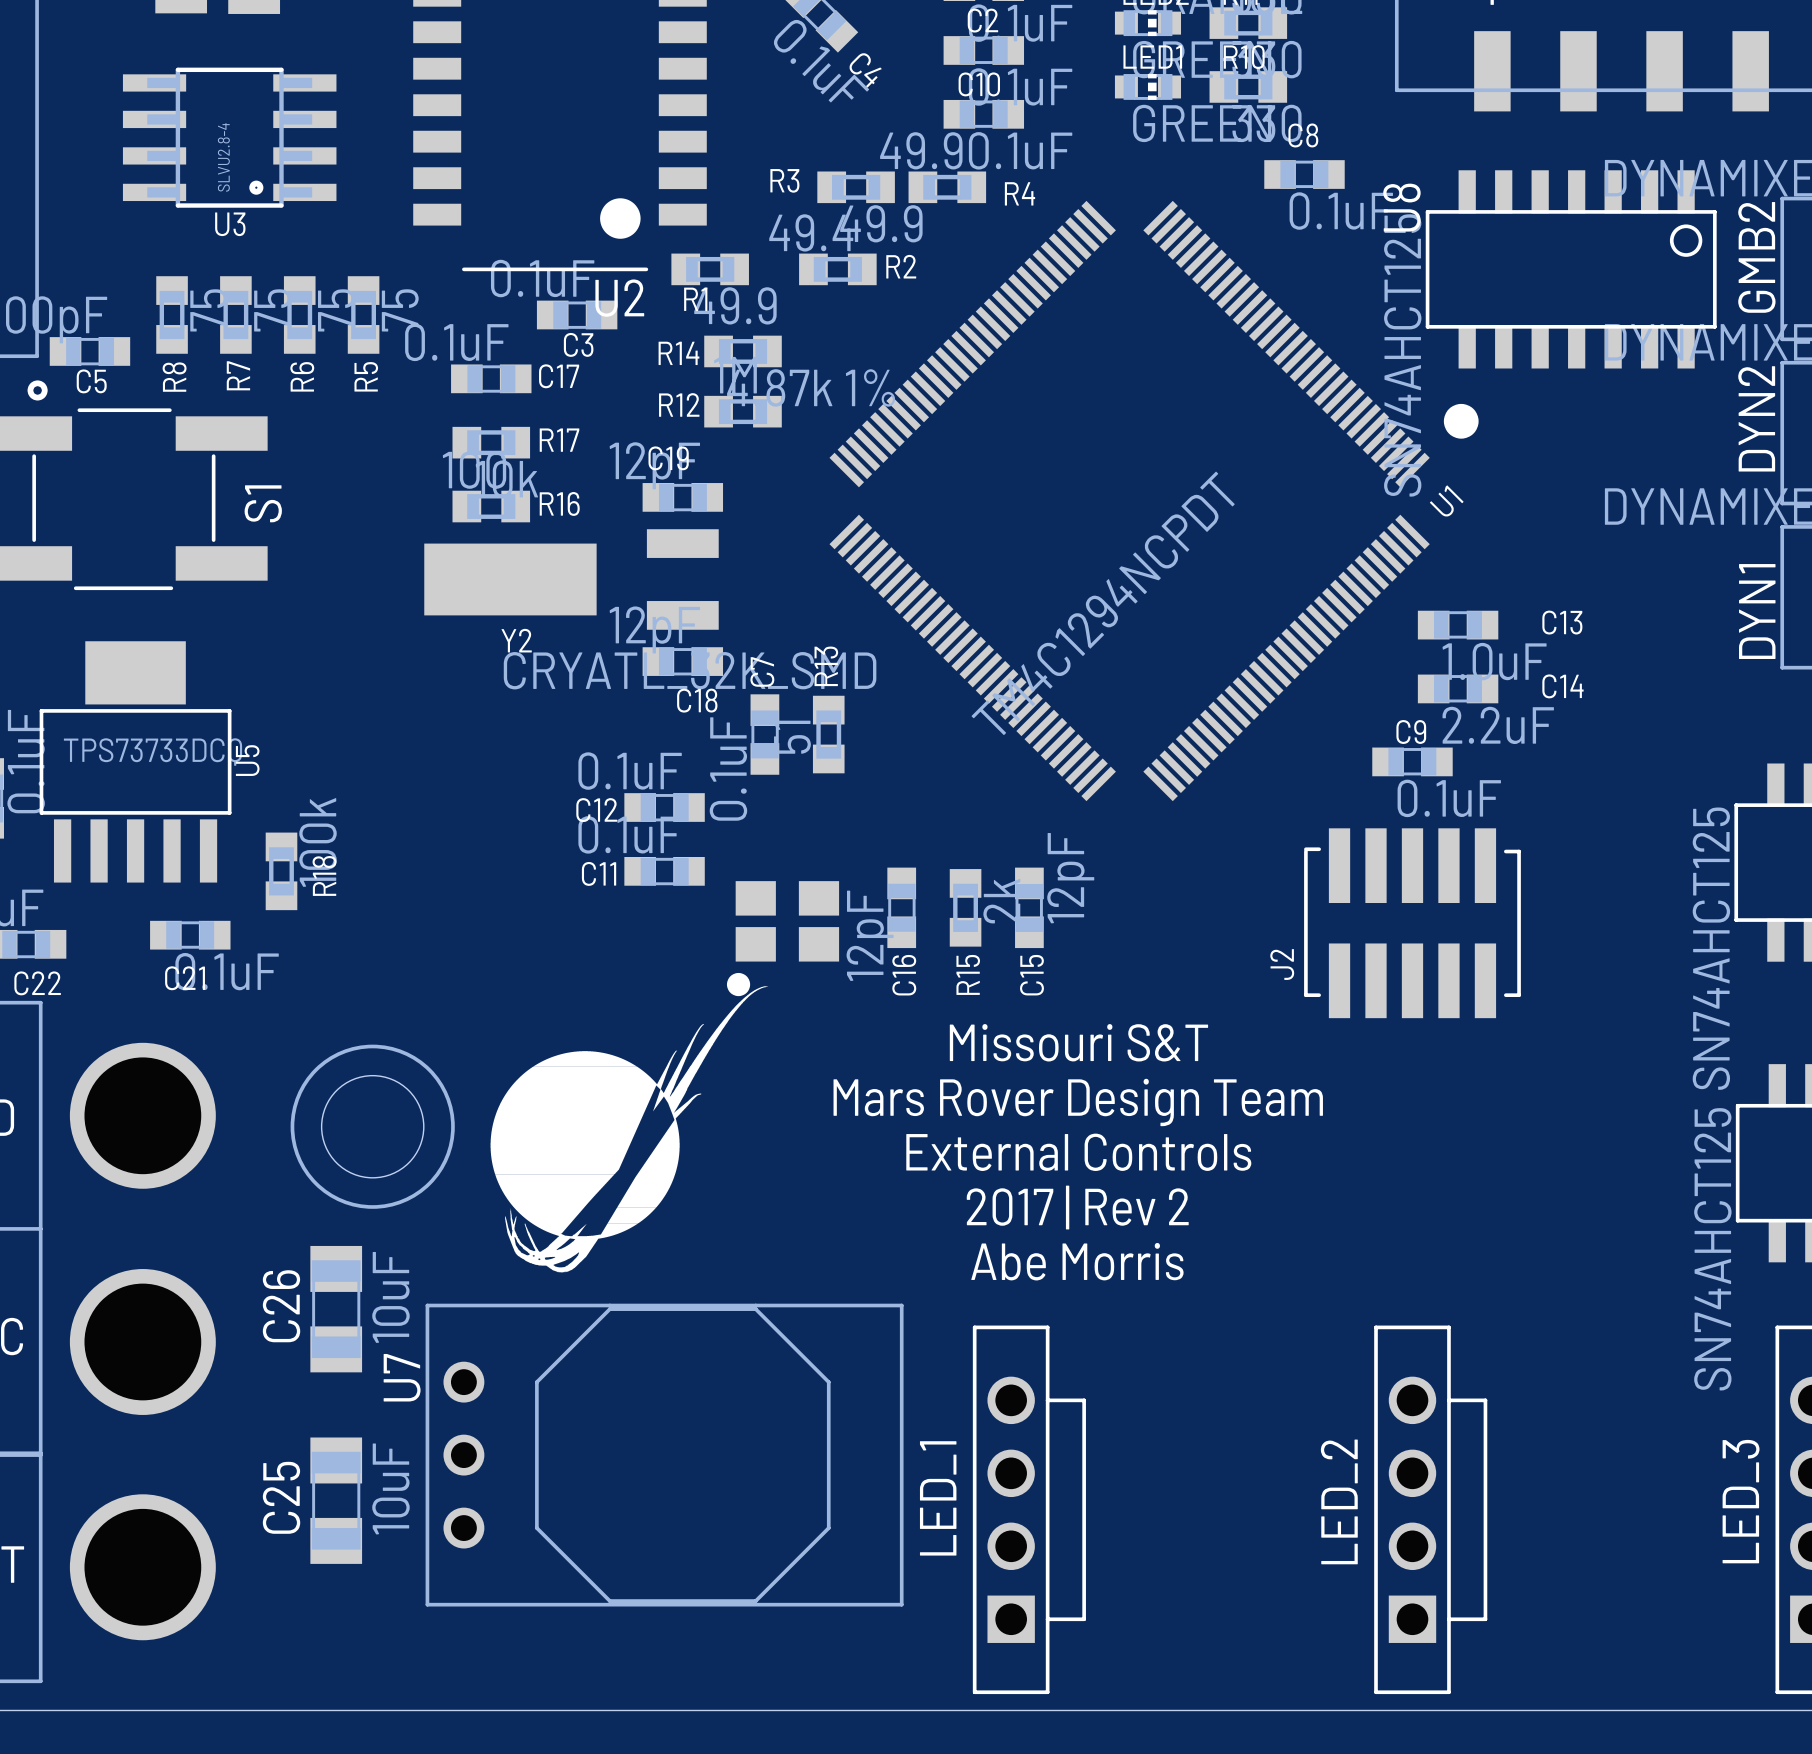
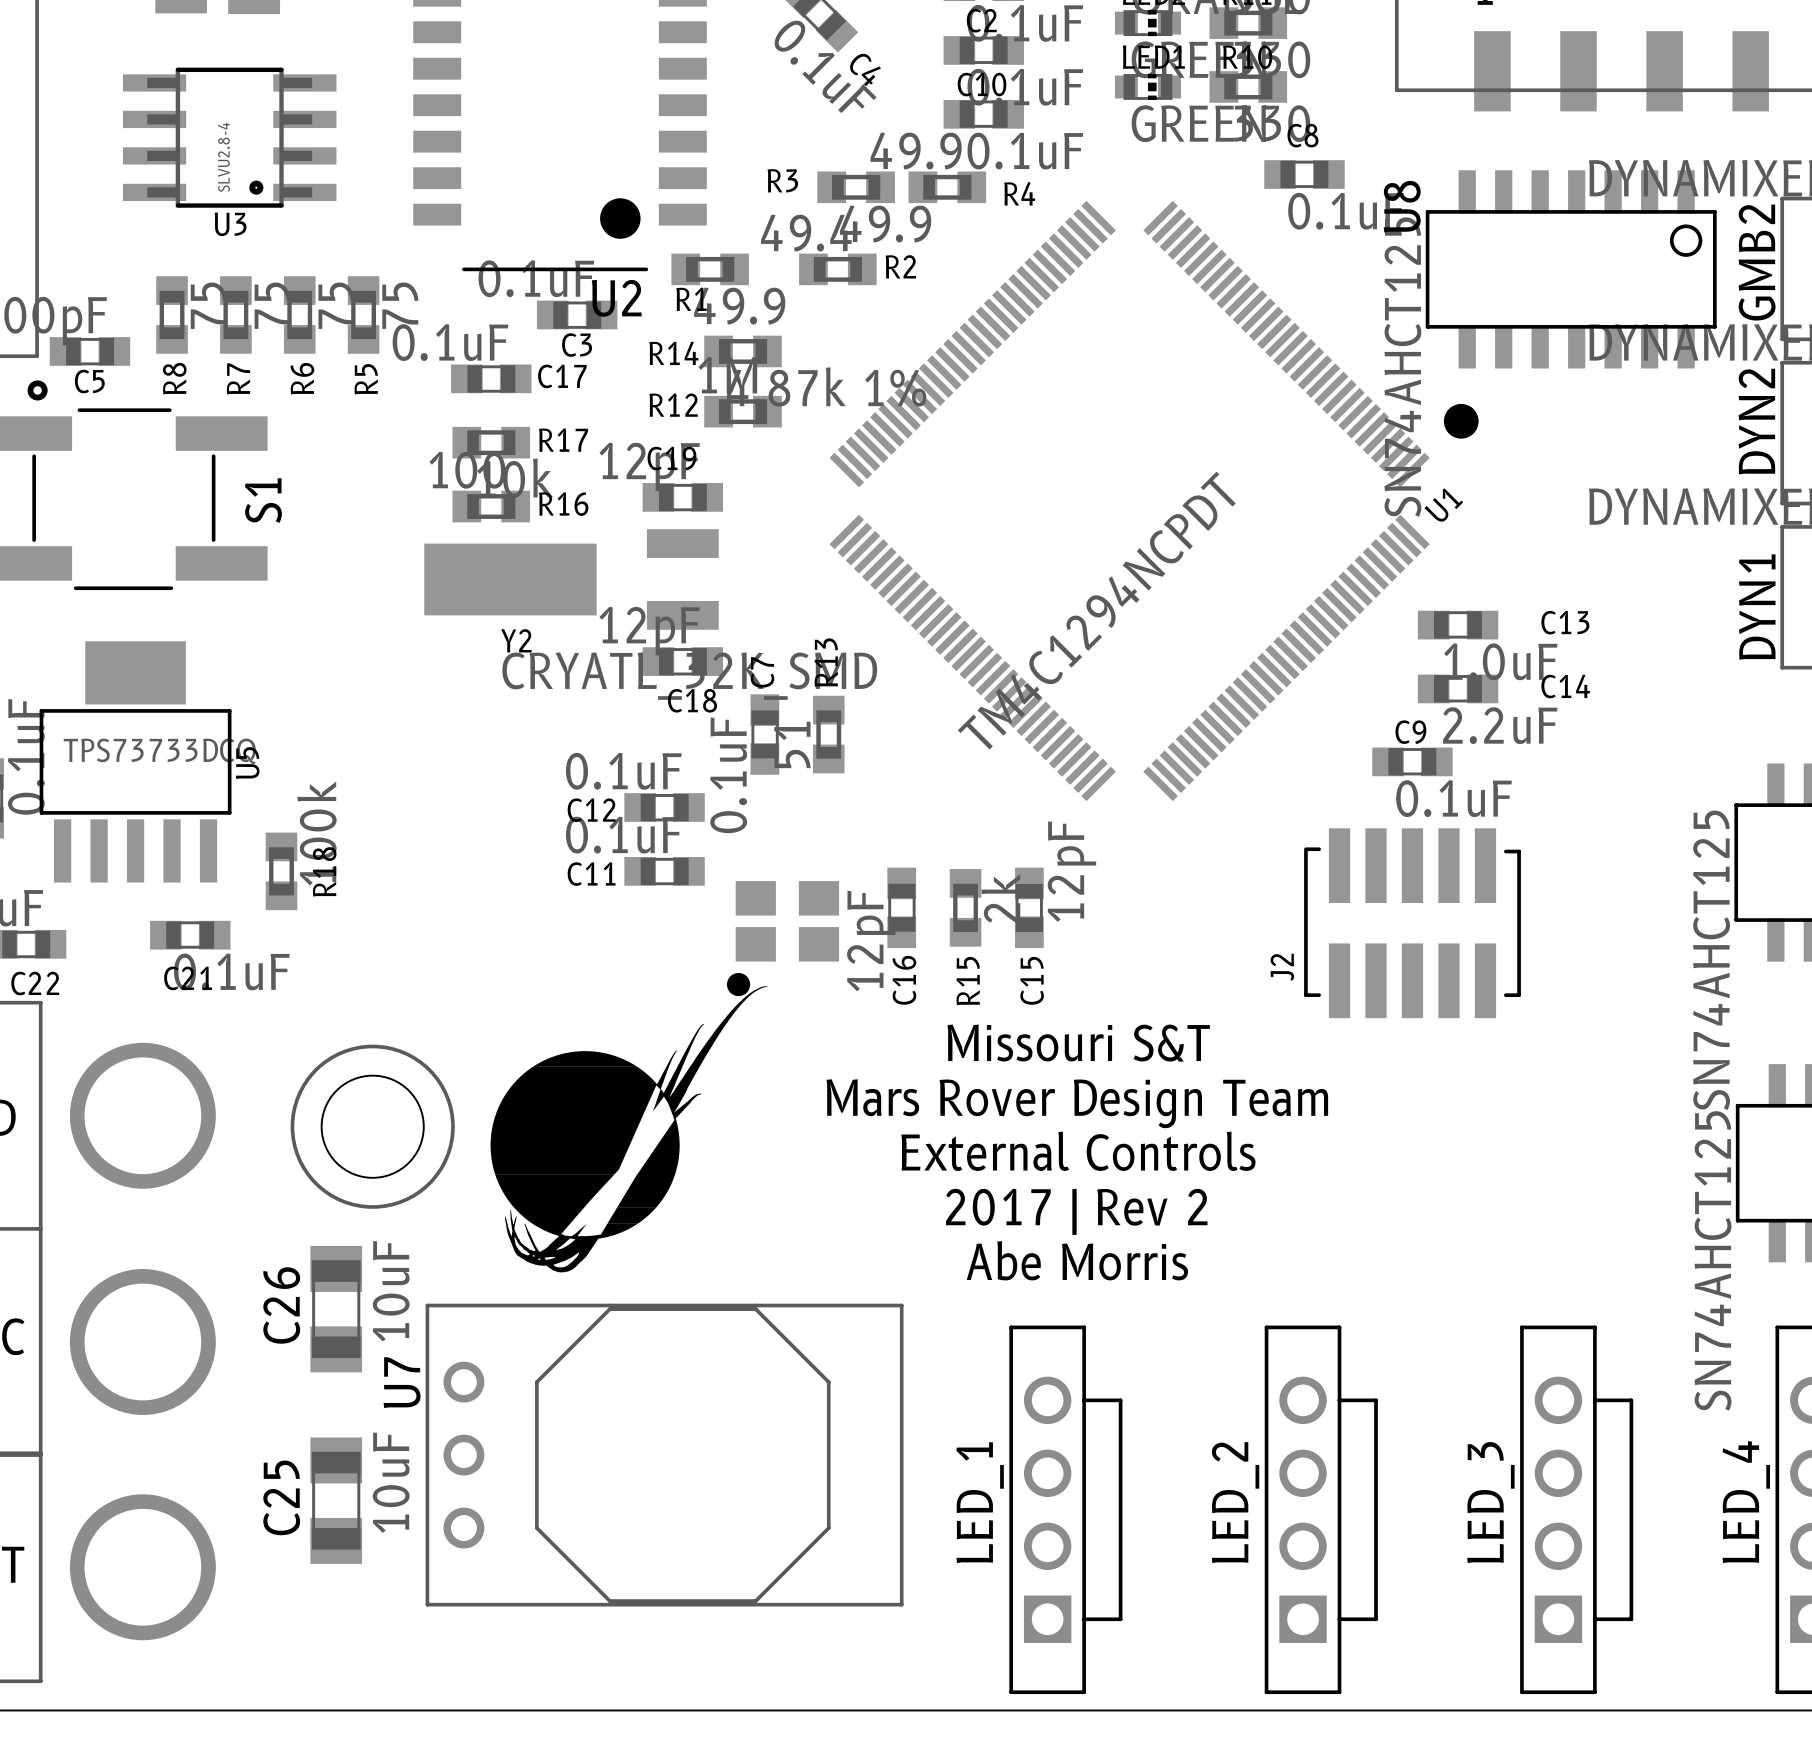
LED_3 name: LED_3 (1741, 1501) -> LED_4 (1746, 1502)
LED_1 position: (1029, 1509) -> (1065, 1509)
LED_2 position: (1430, 1509) -> (1321, 1509)
LED_3: none -> (1576, 1509)

